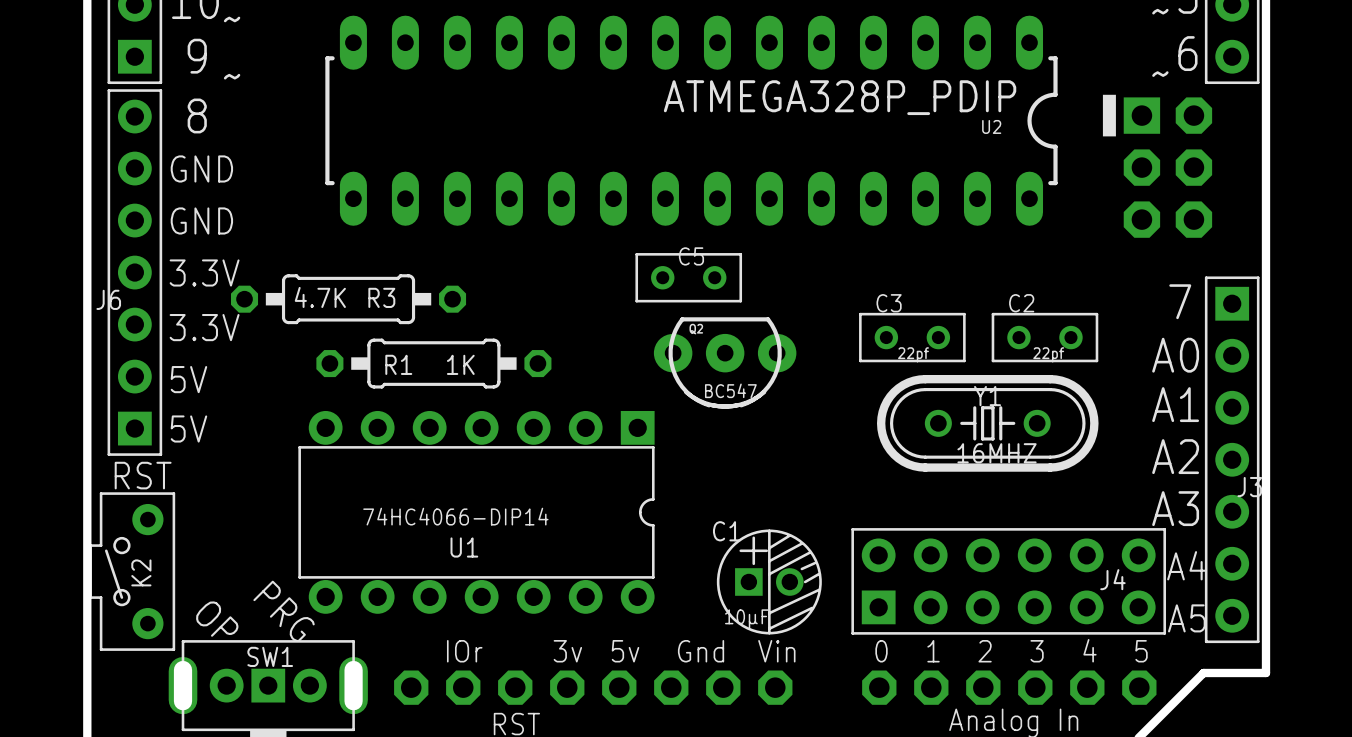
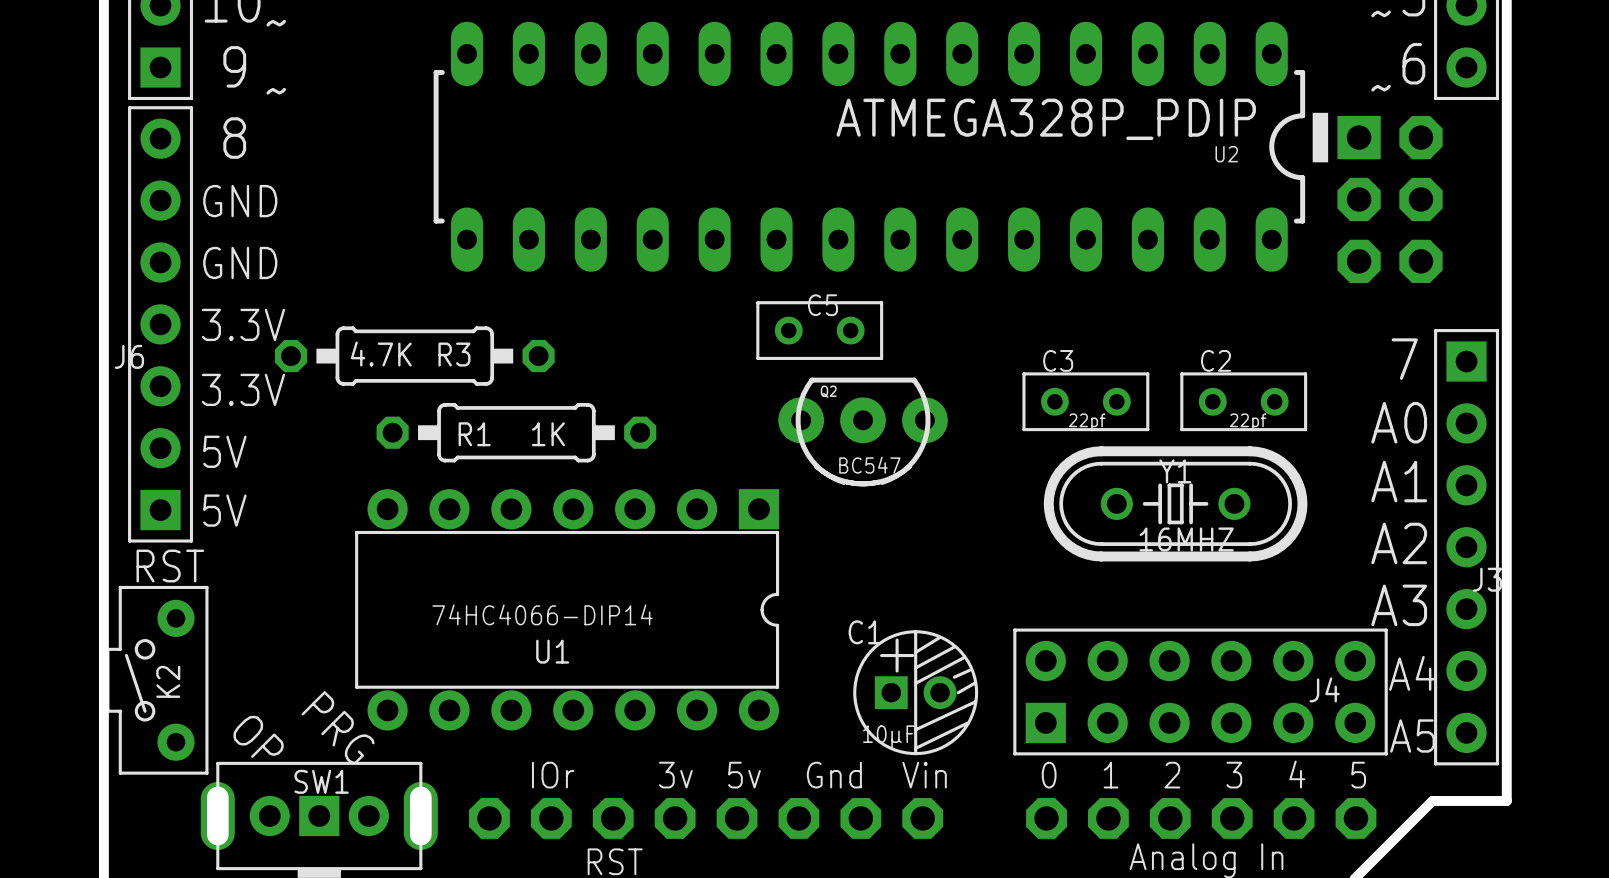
U2 position: (691, 120) -> (869, 146)

